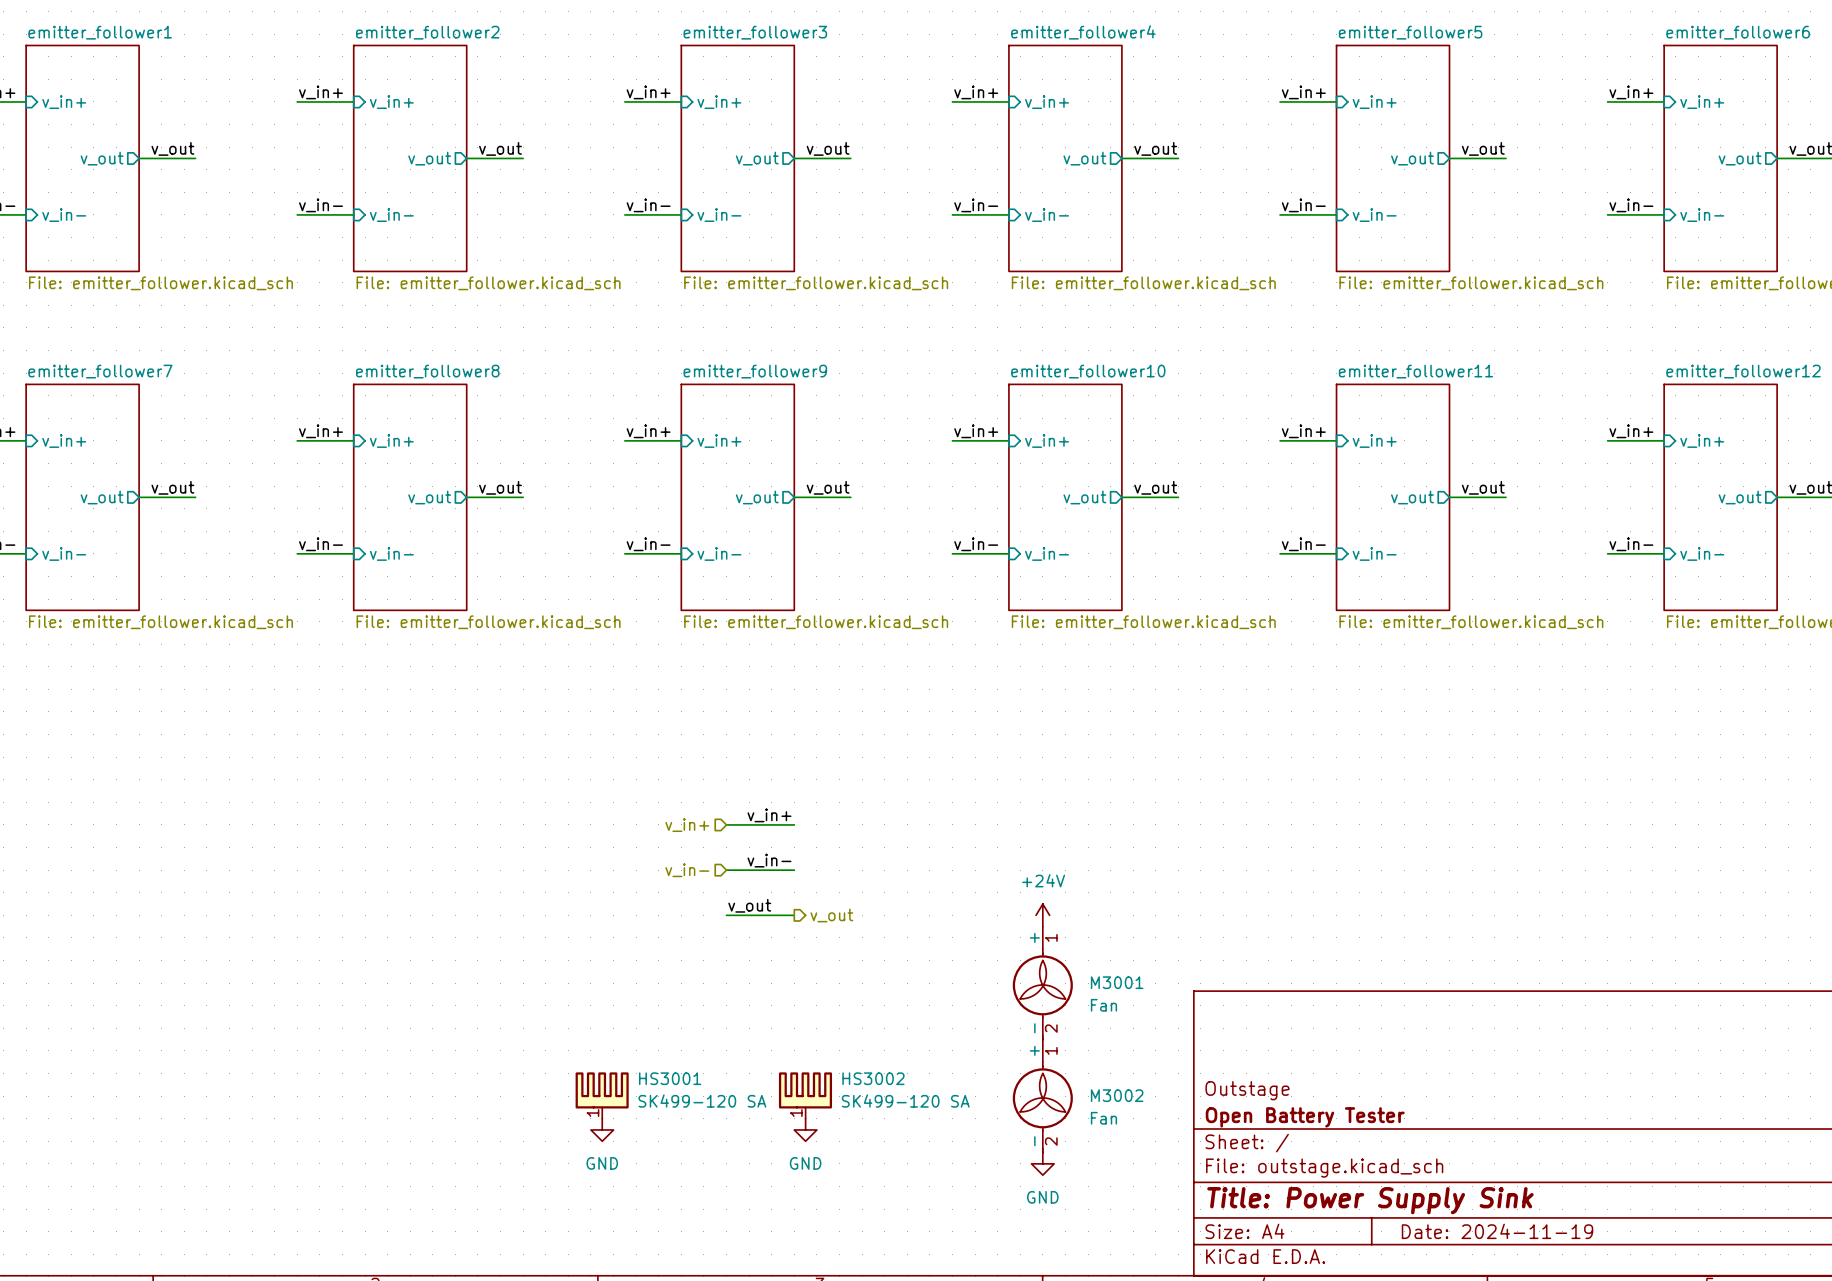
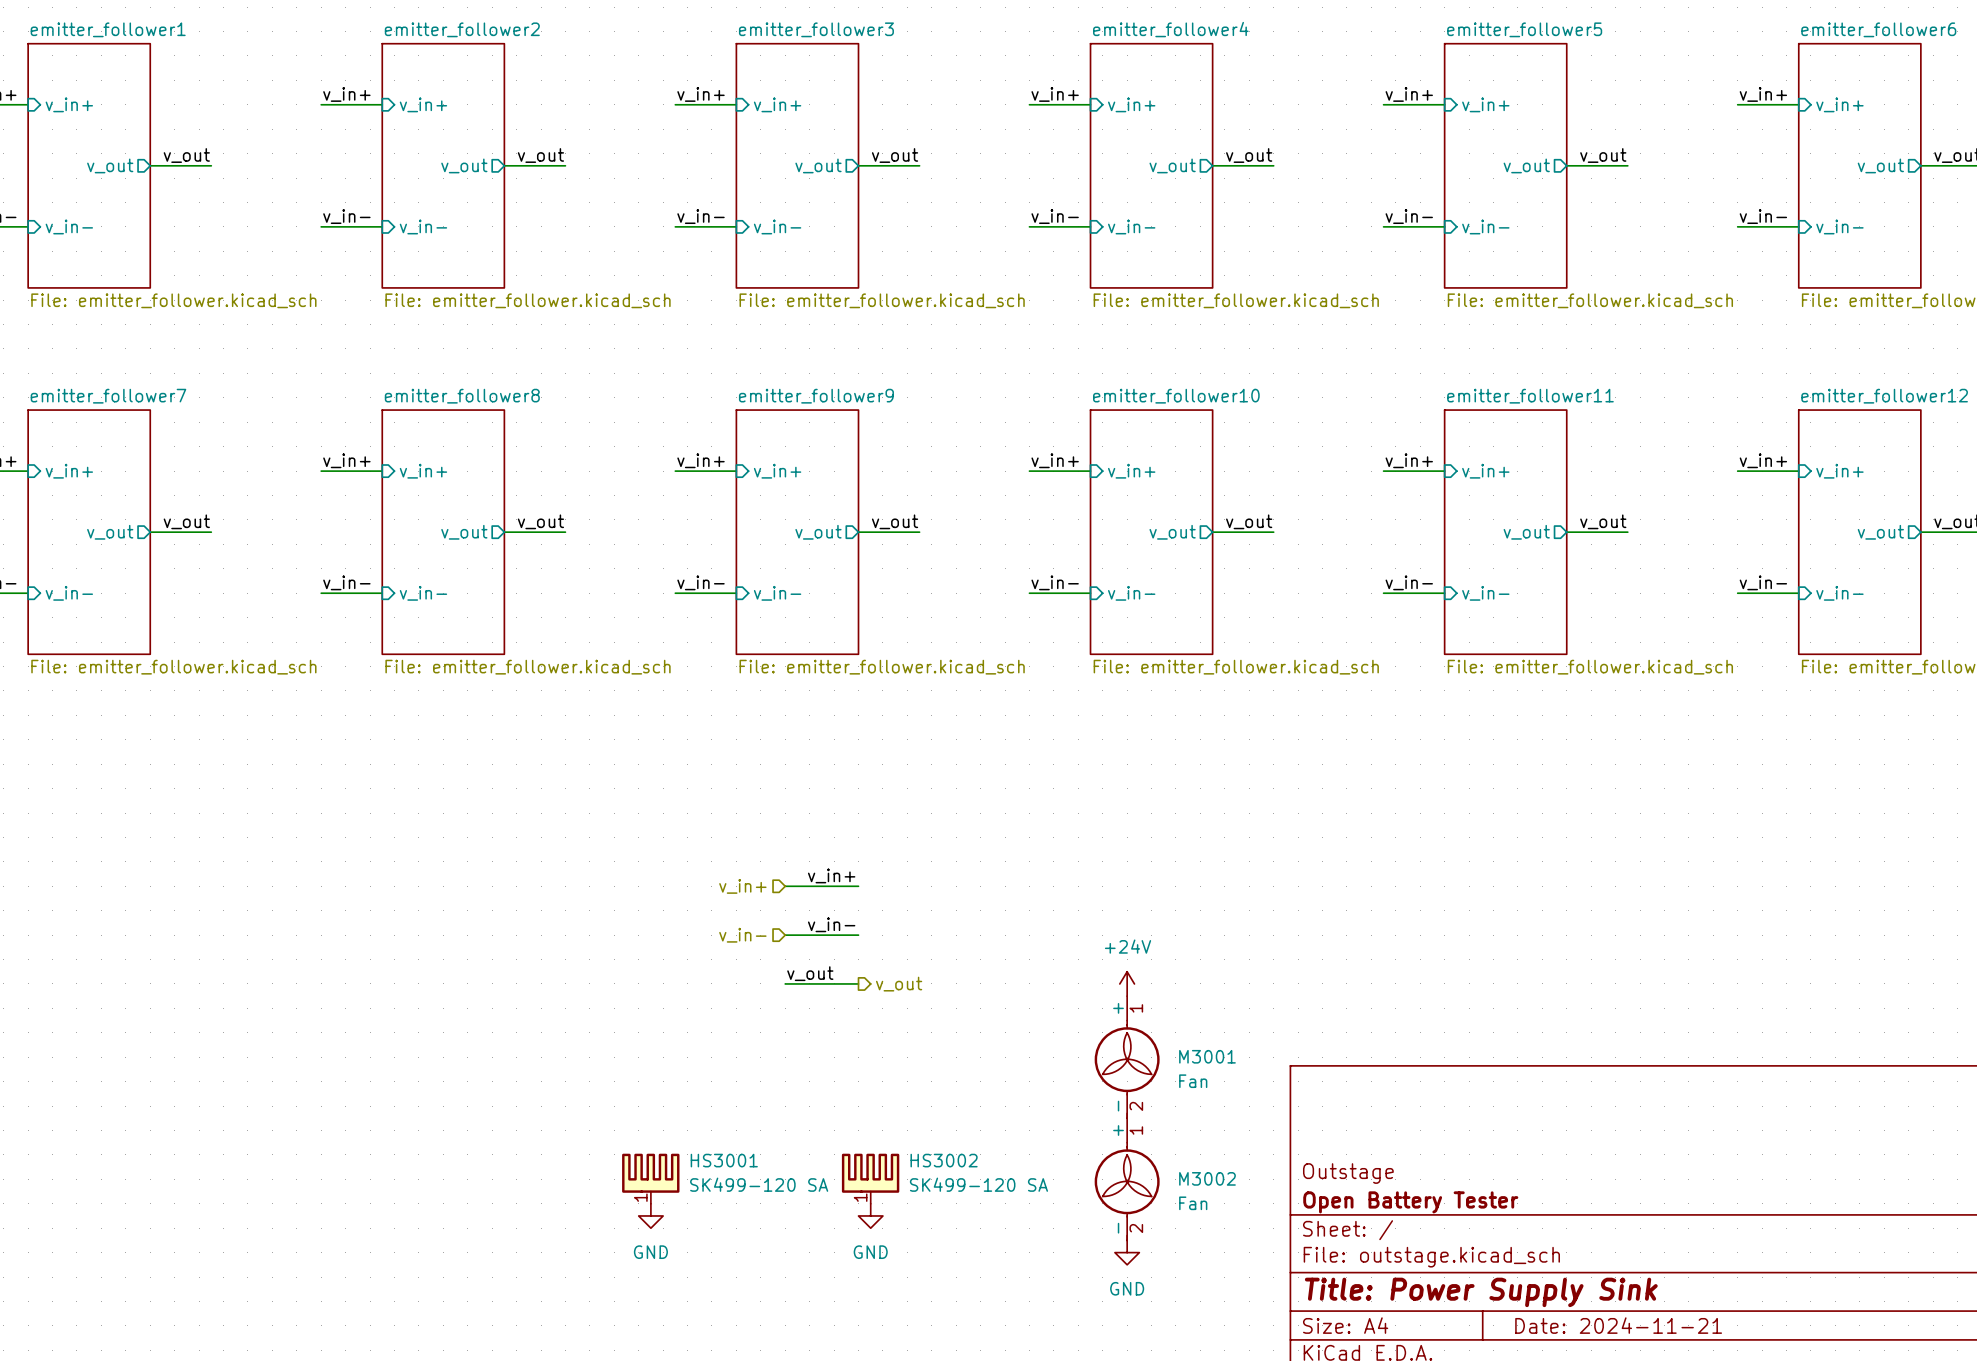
title block: Date: 2024-11-19 (1497, 1231) -> Date: 2024-11-21 (1618, 1325)

